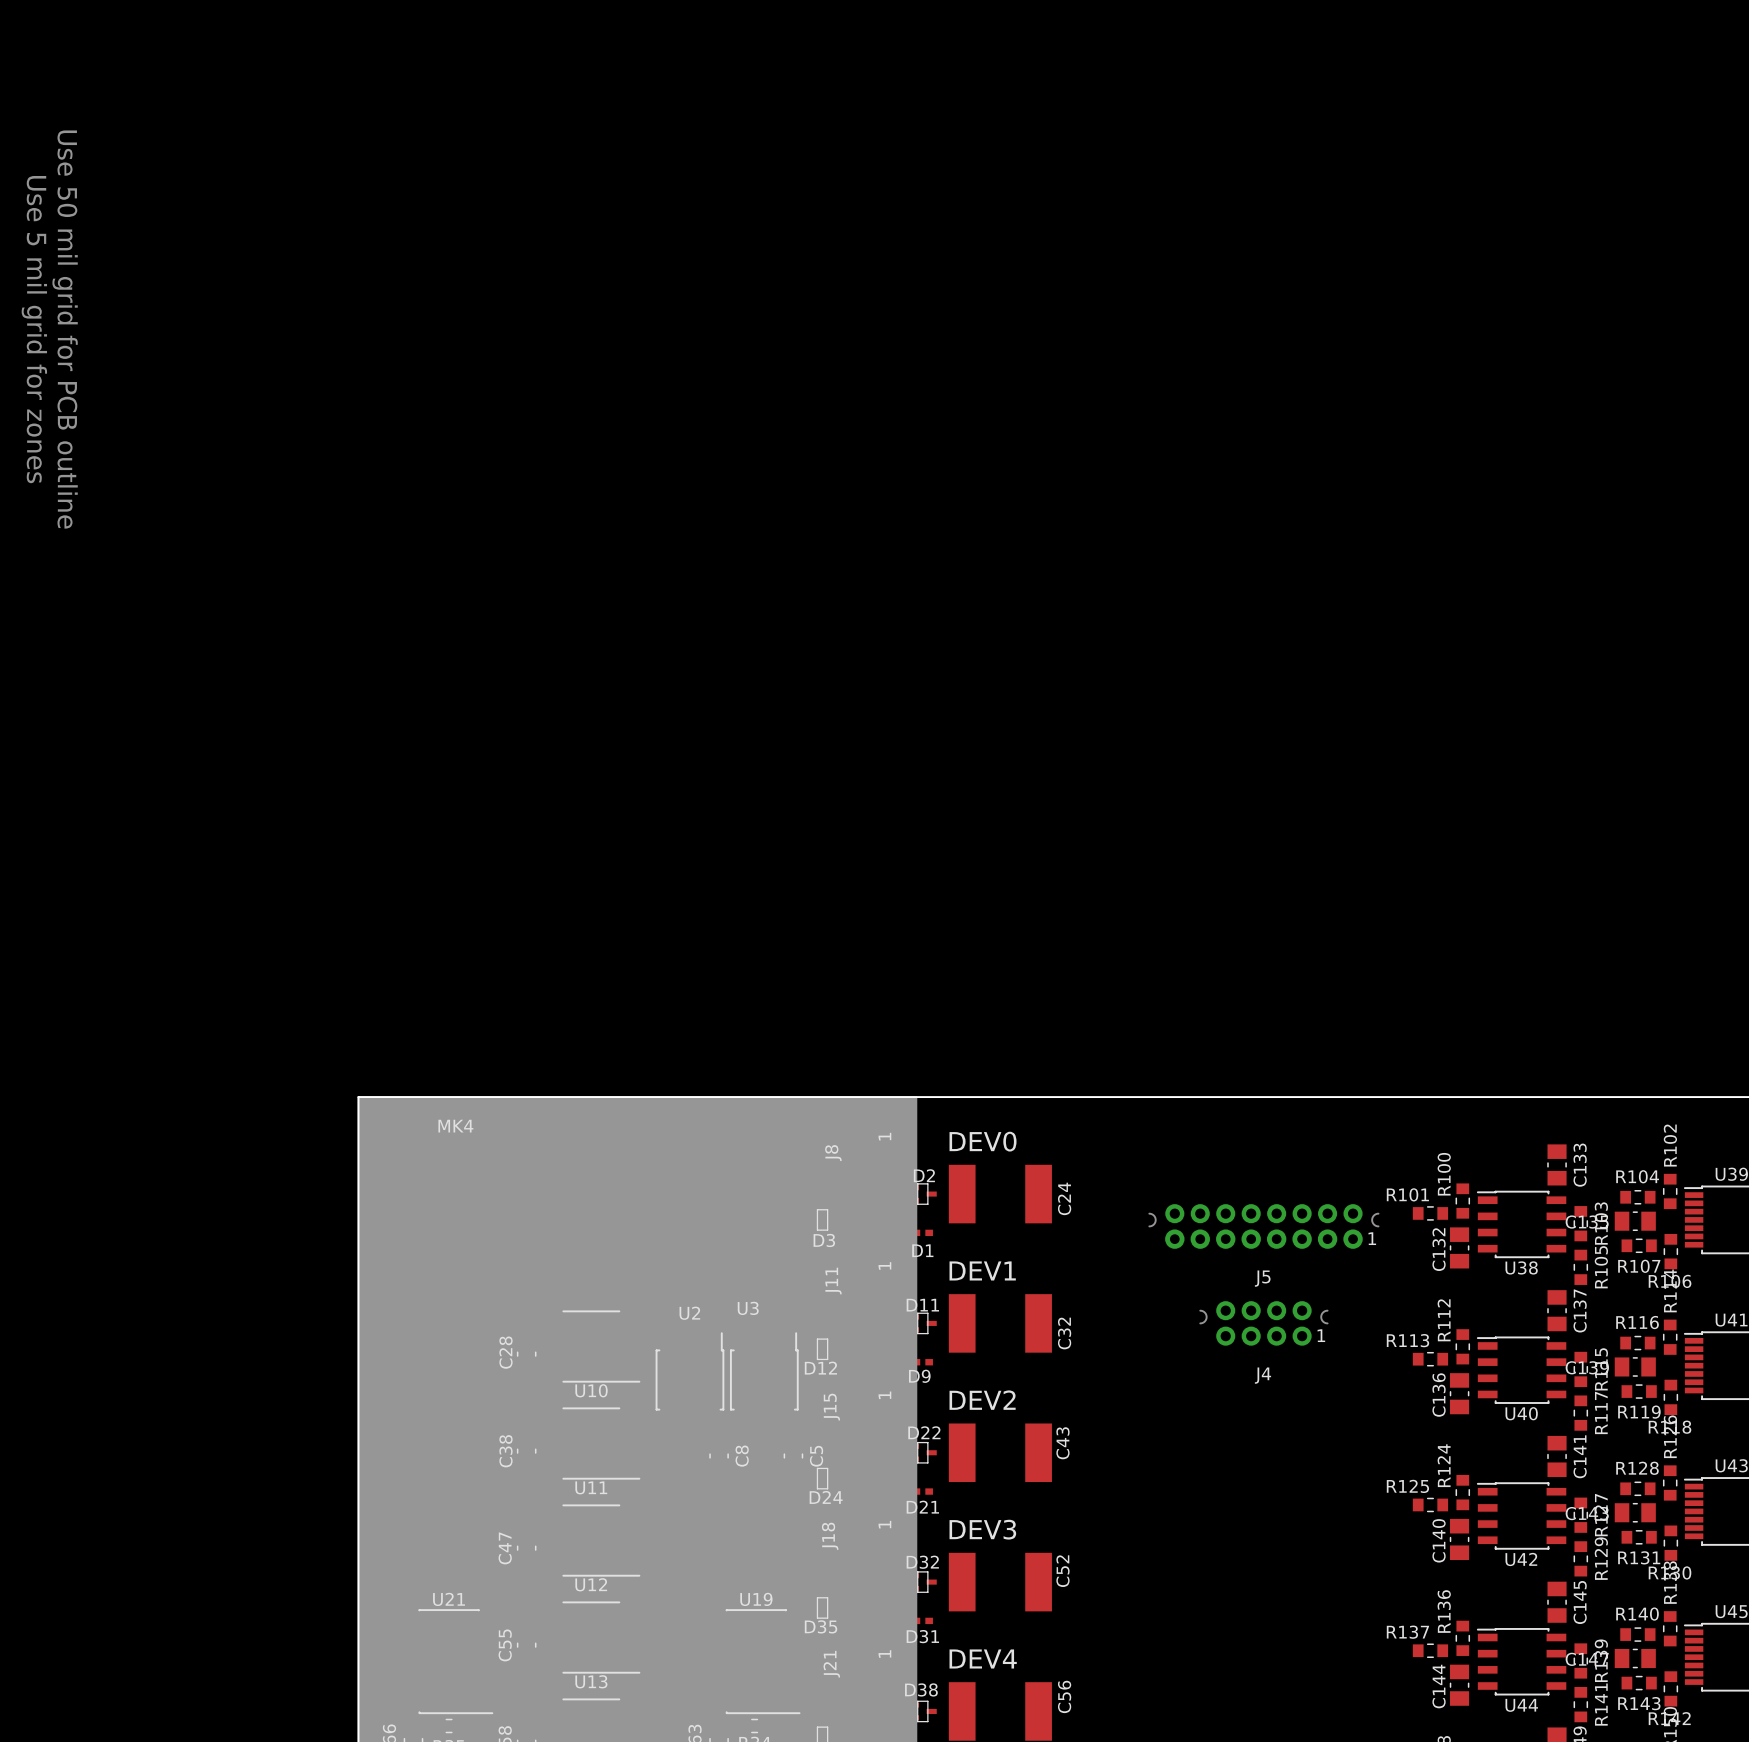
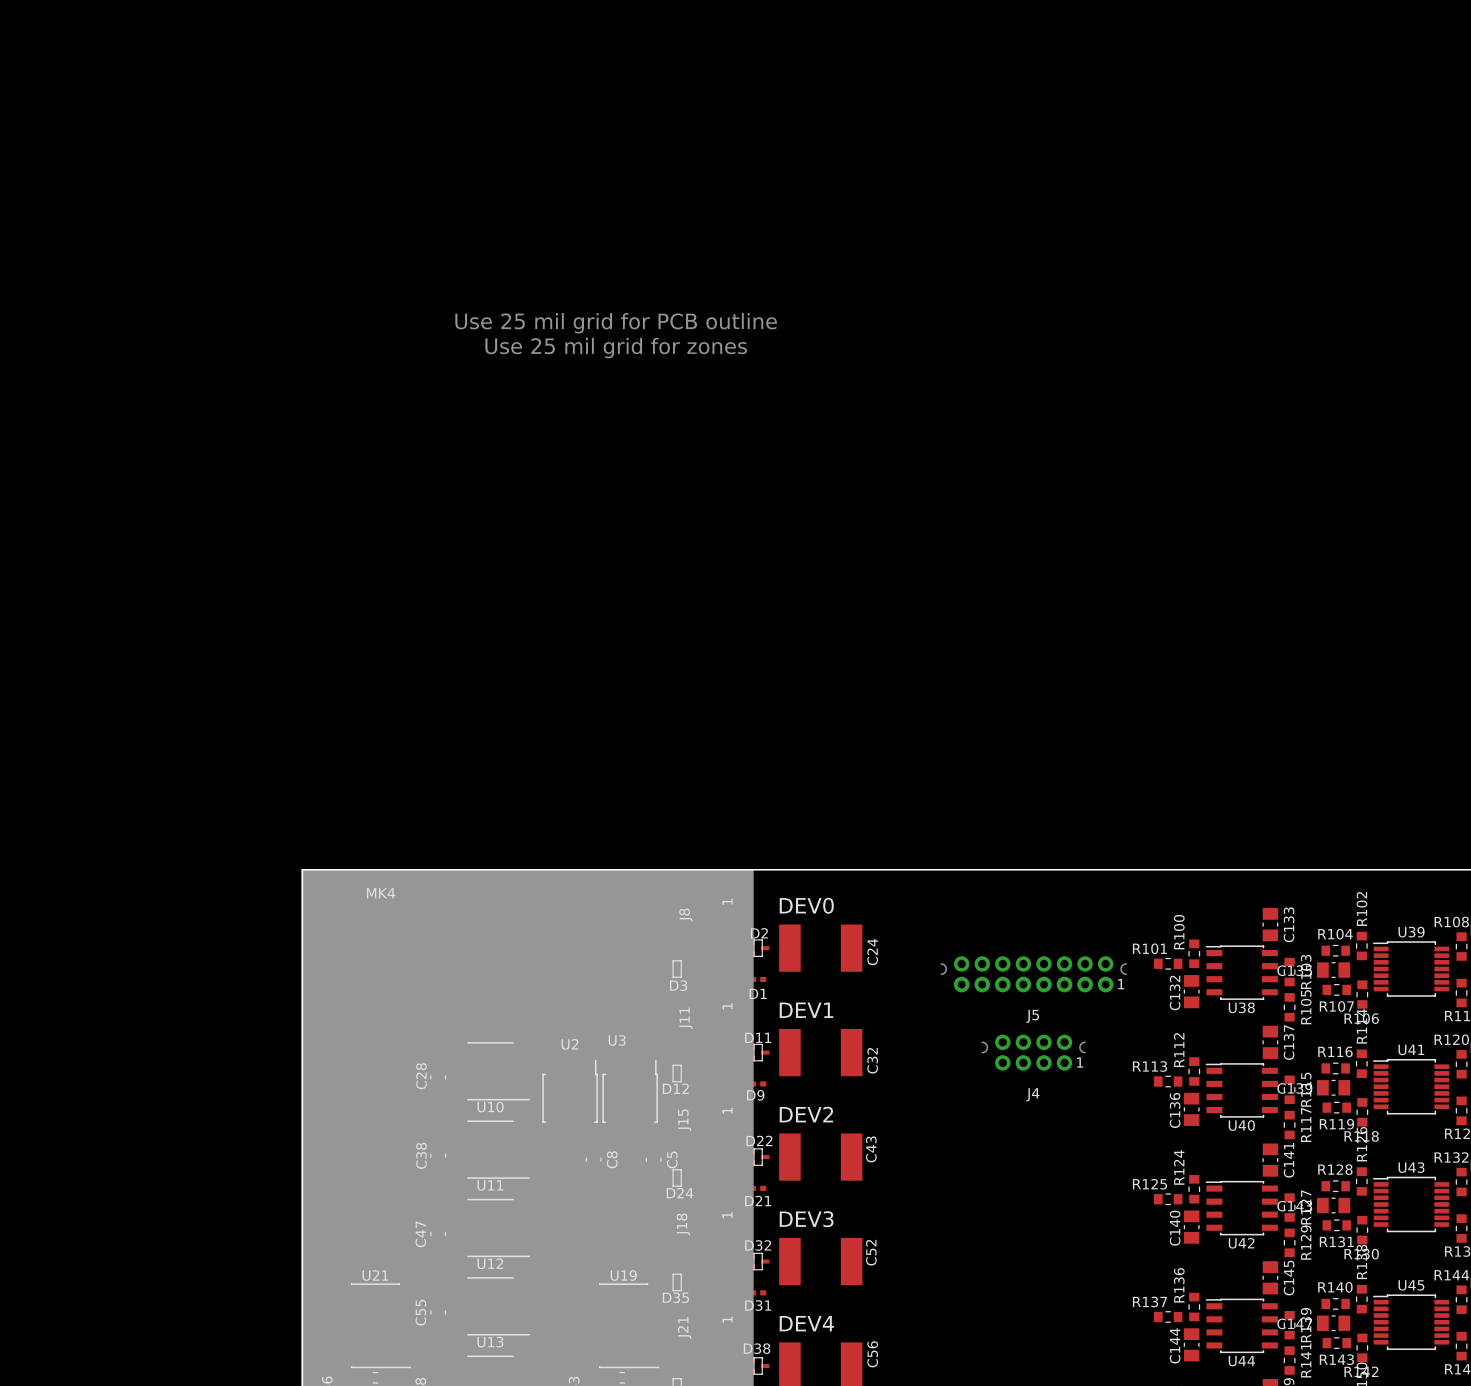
text: Use 5 mil grid for zones (34, 329) -> none
text: Use 50 mil grid for PCB outline (65, 329) -> none
text: none -> Use 25 mil grid for PCB outline (616, 323)
text: none -> Use 25 mil grid for zones (616, 348)

